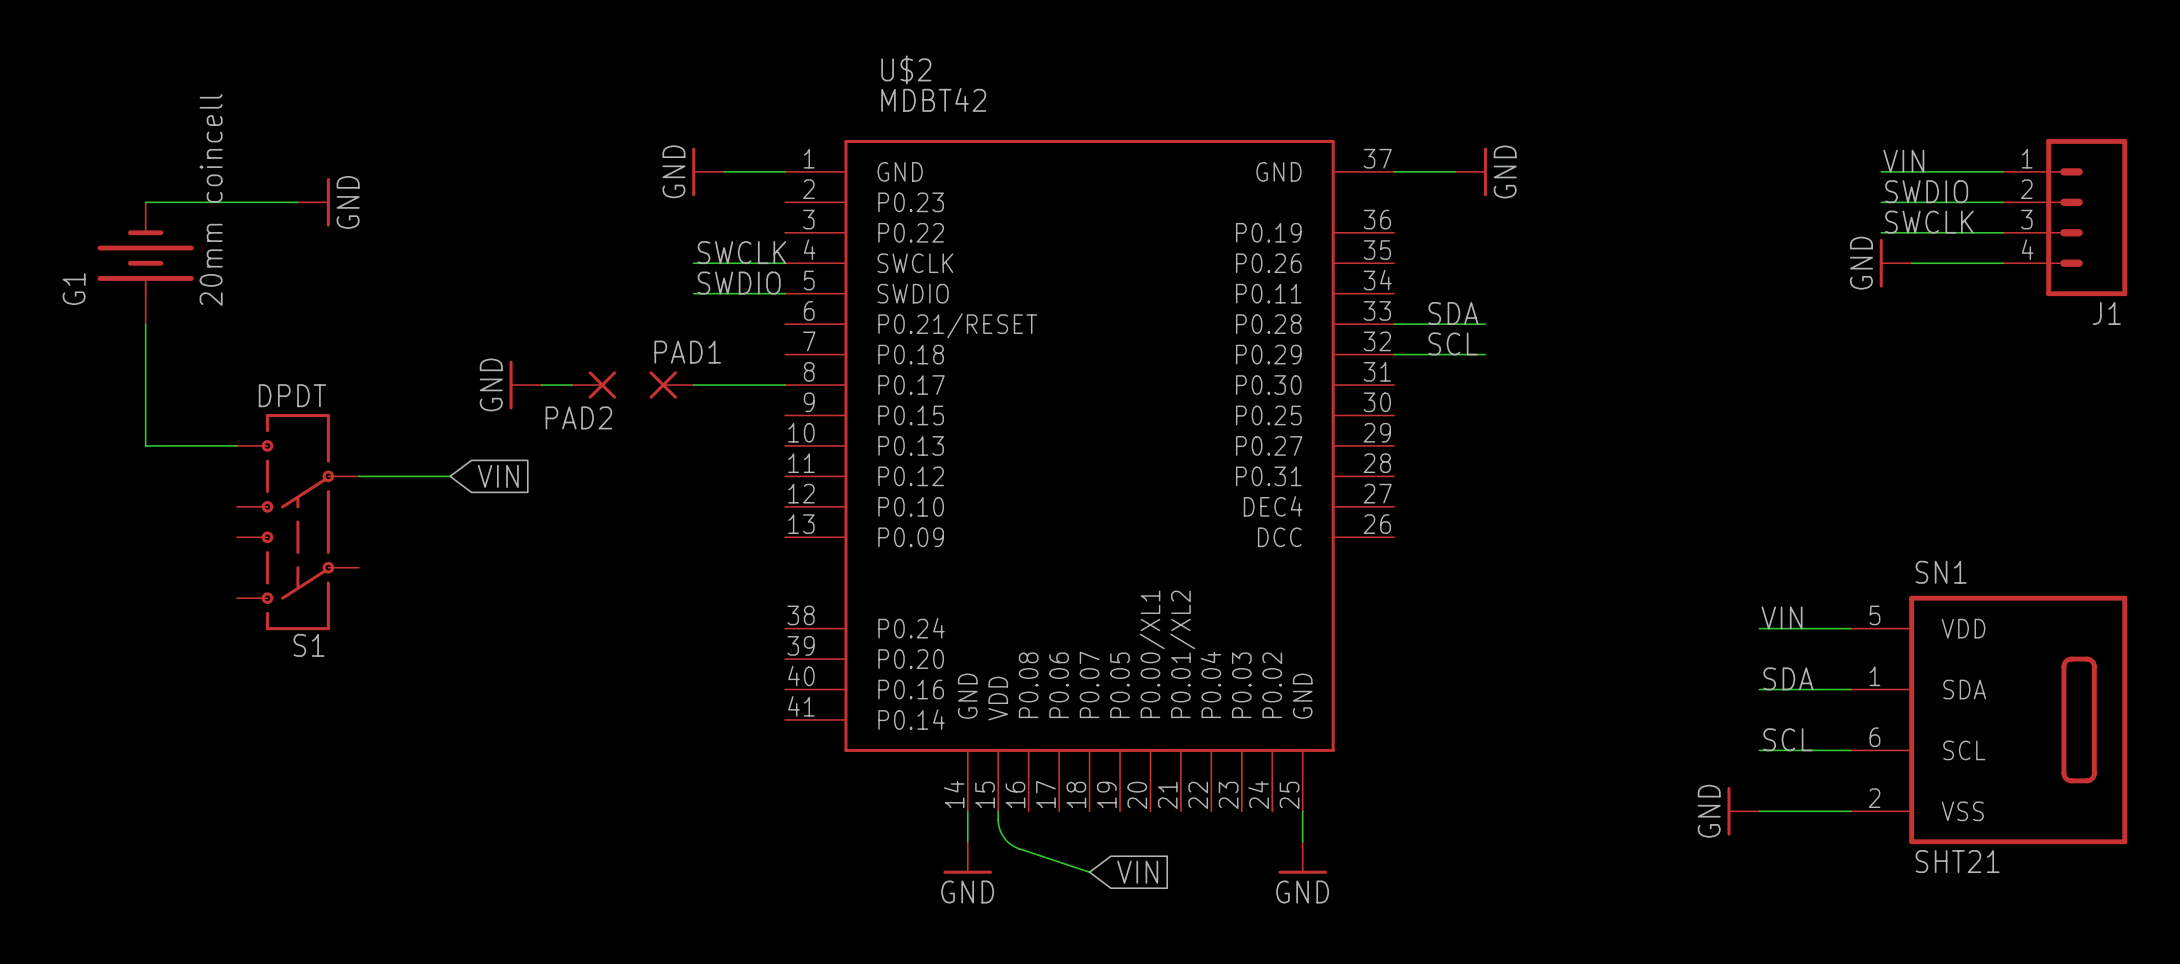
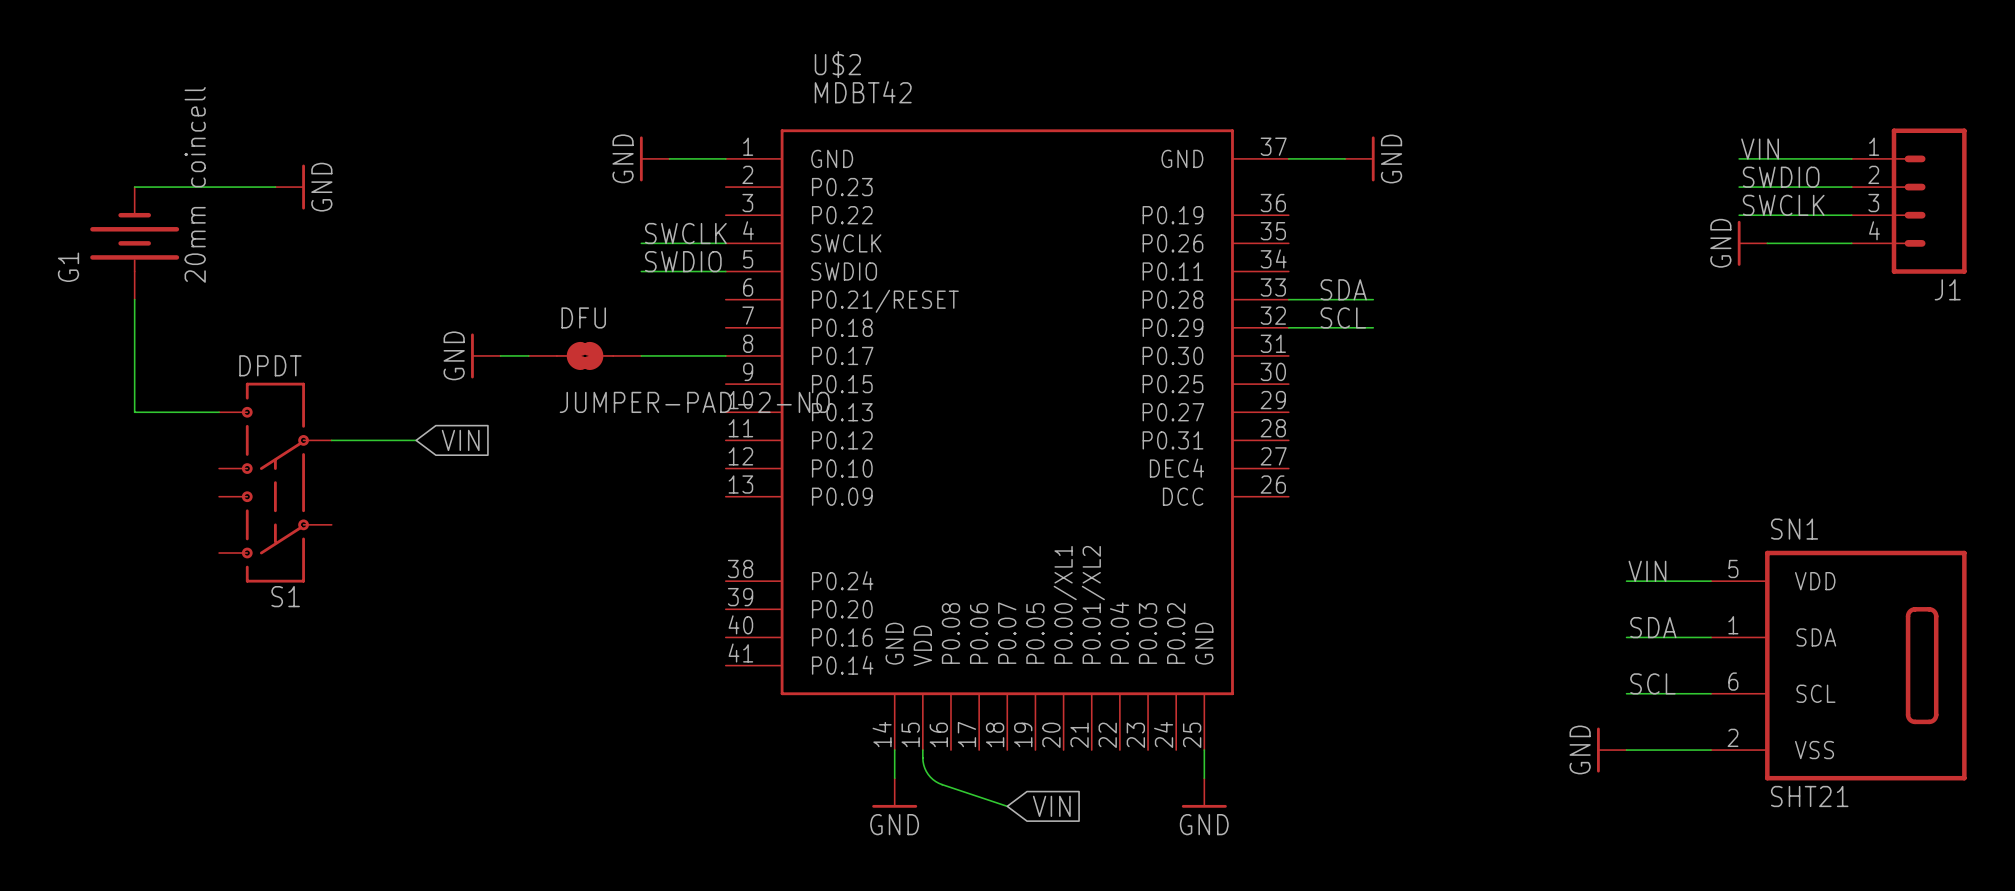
PAD2: (594, 385) -> none
DFU: none -> JUMPER-PAD-2-NO (585, 355)
PAD1: (671, 385) -> none

